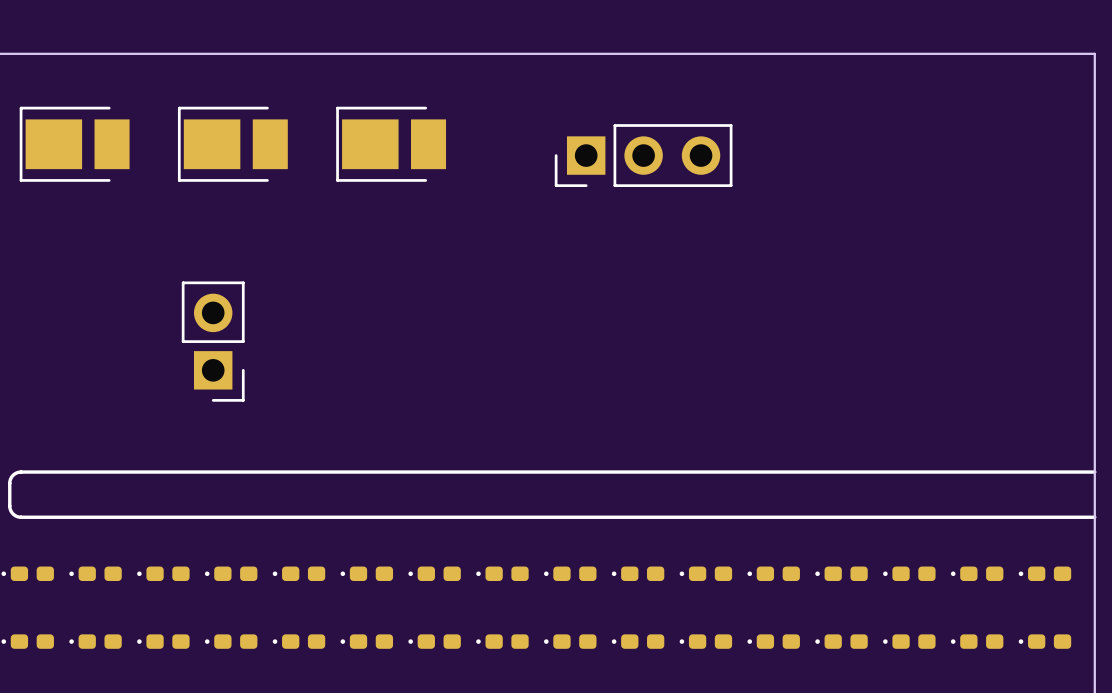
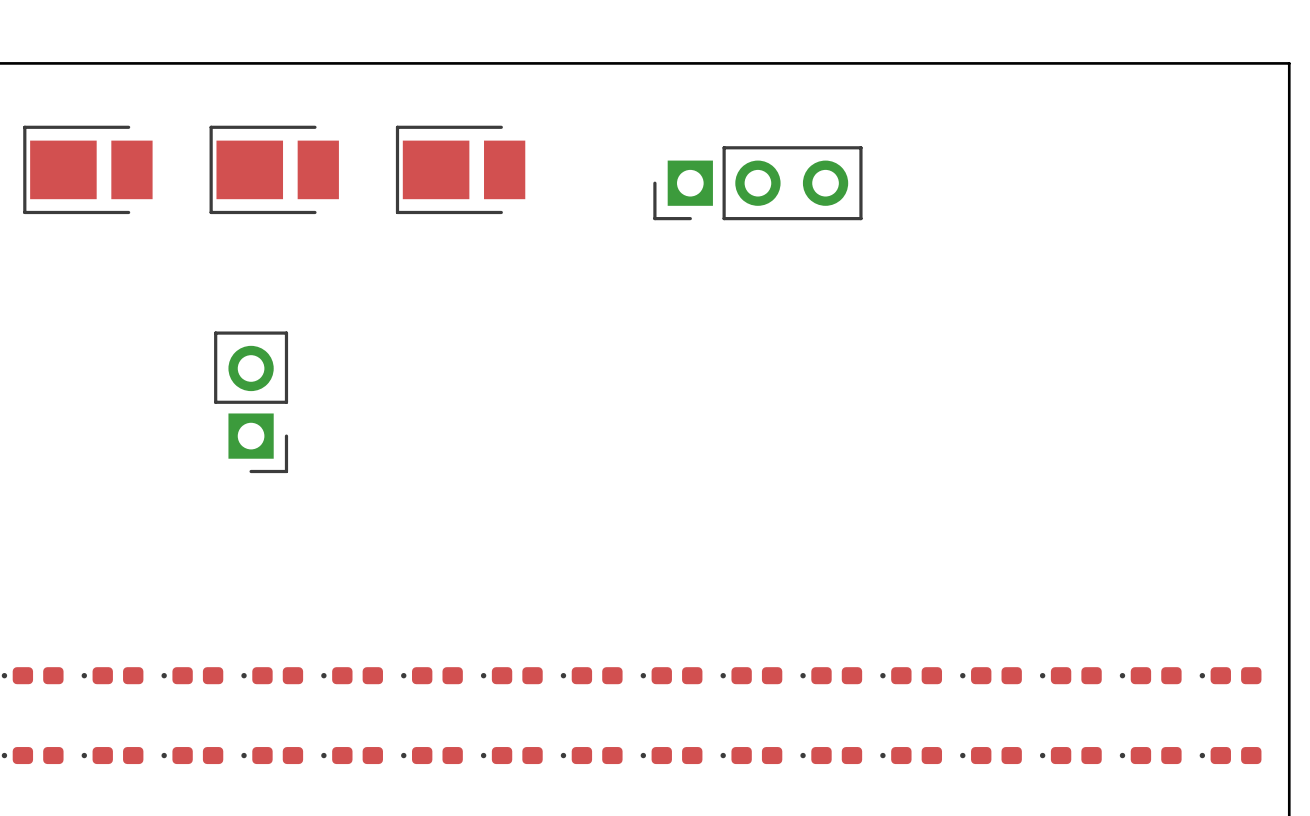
line: (1094, 472) (21, 472) (13, 475) (9, 483) (10, 508) (14, 514) (21, 517) (1094, 517) -> none

